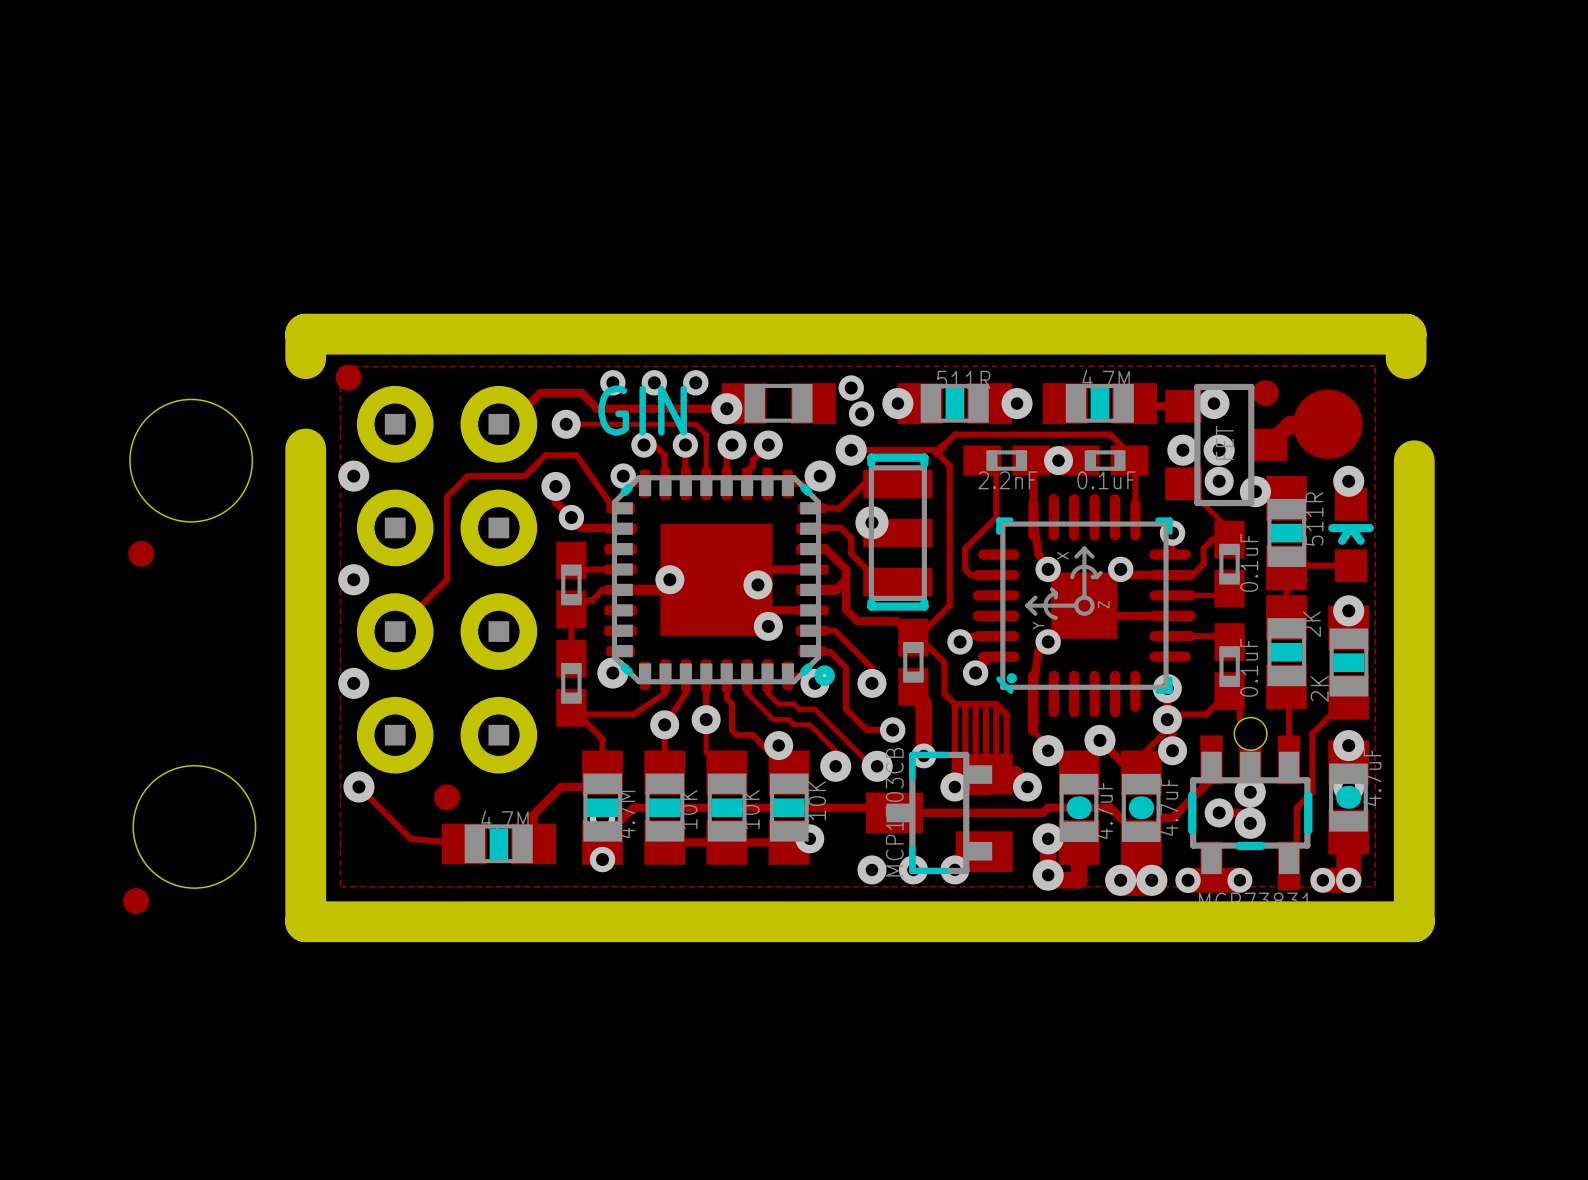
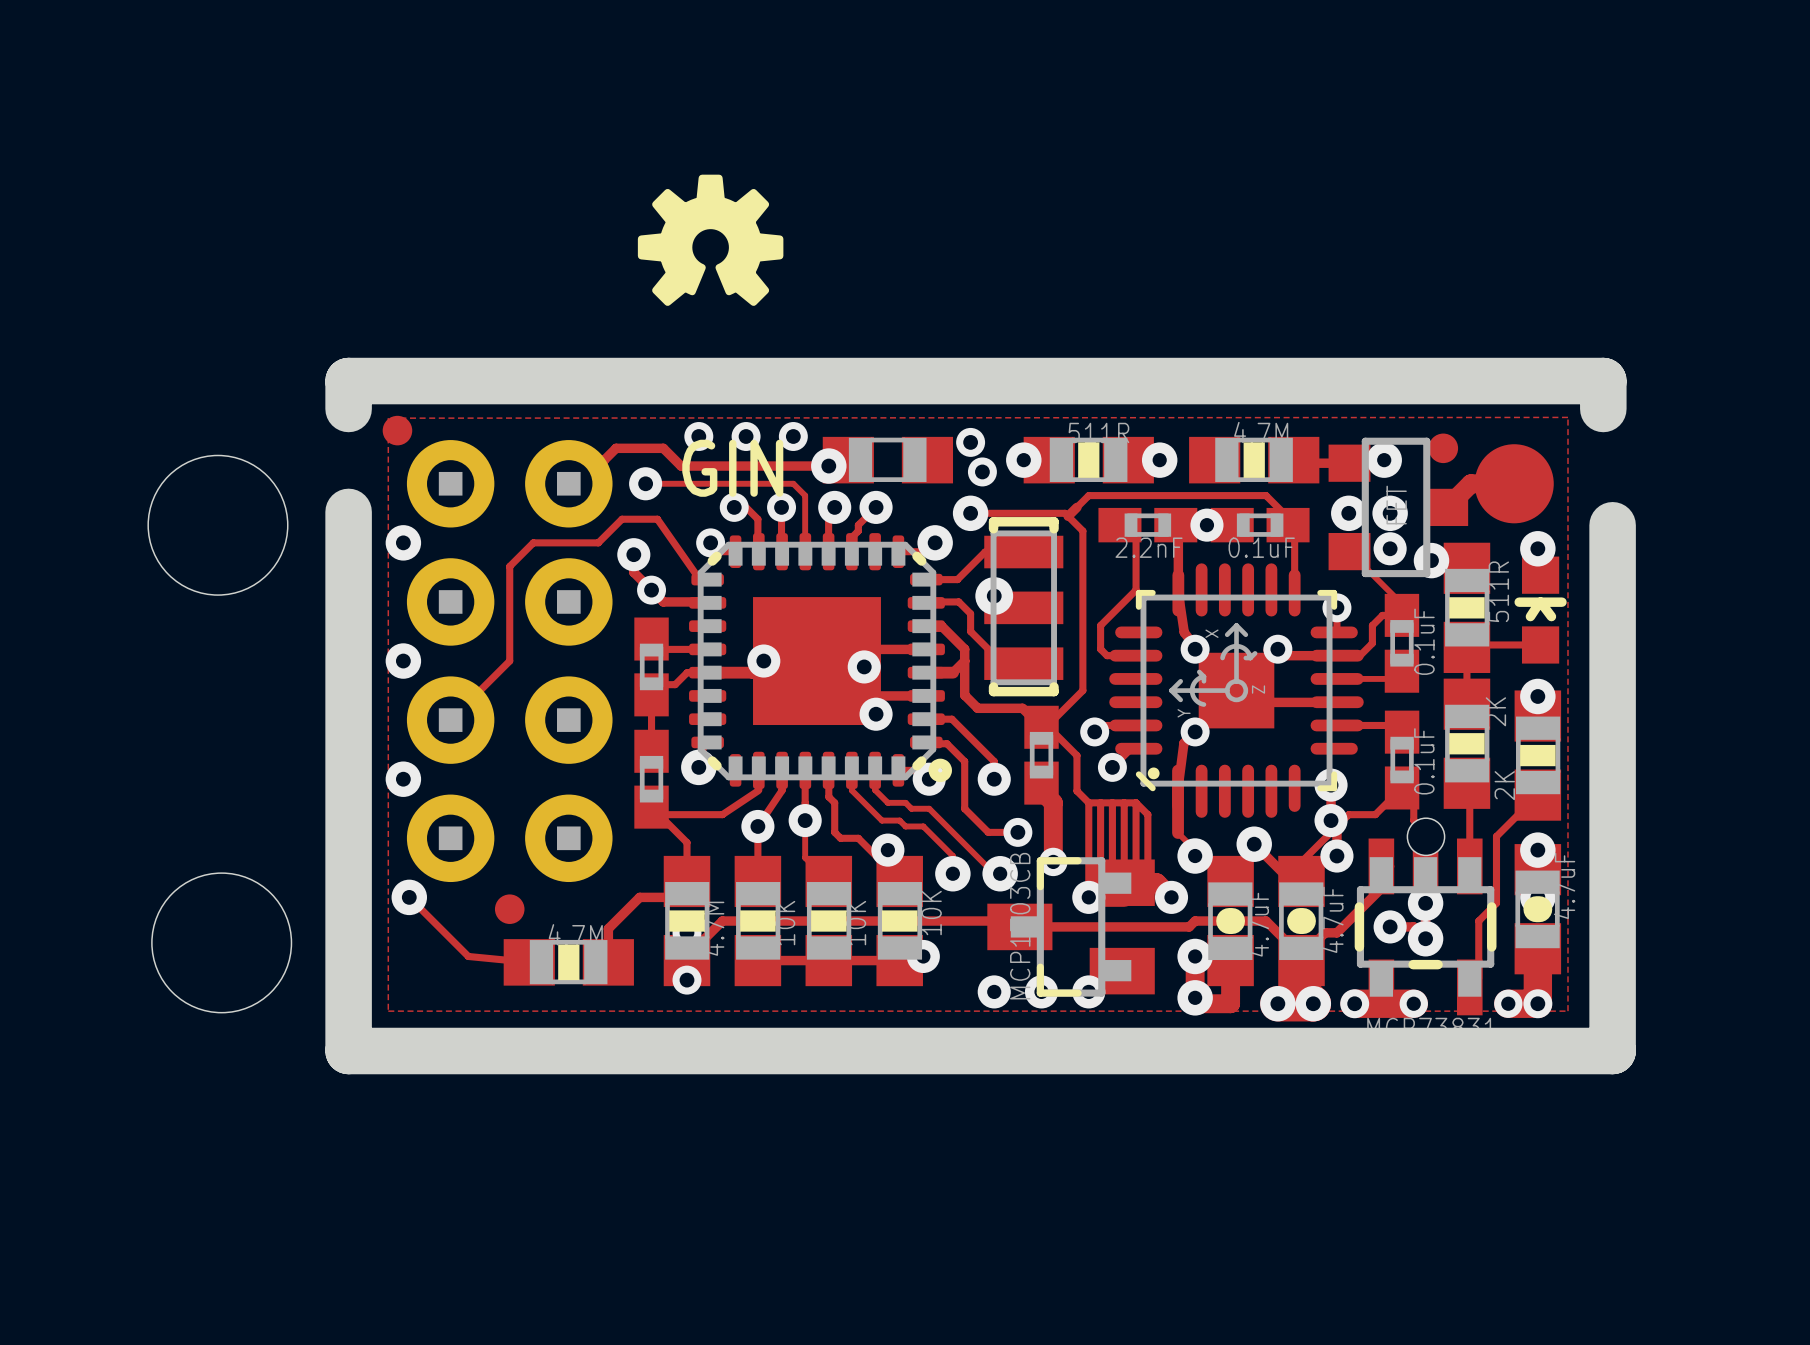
drawing: none -> [637, 174, 784, 306]
part: (141, 553) -> none
part: (136, 901) -> none

